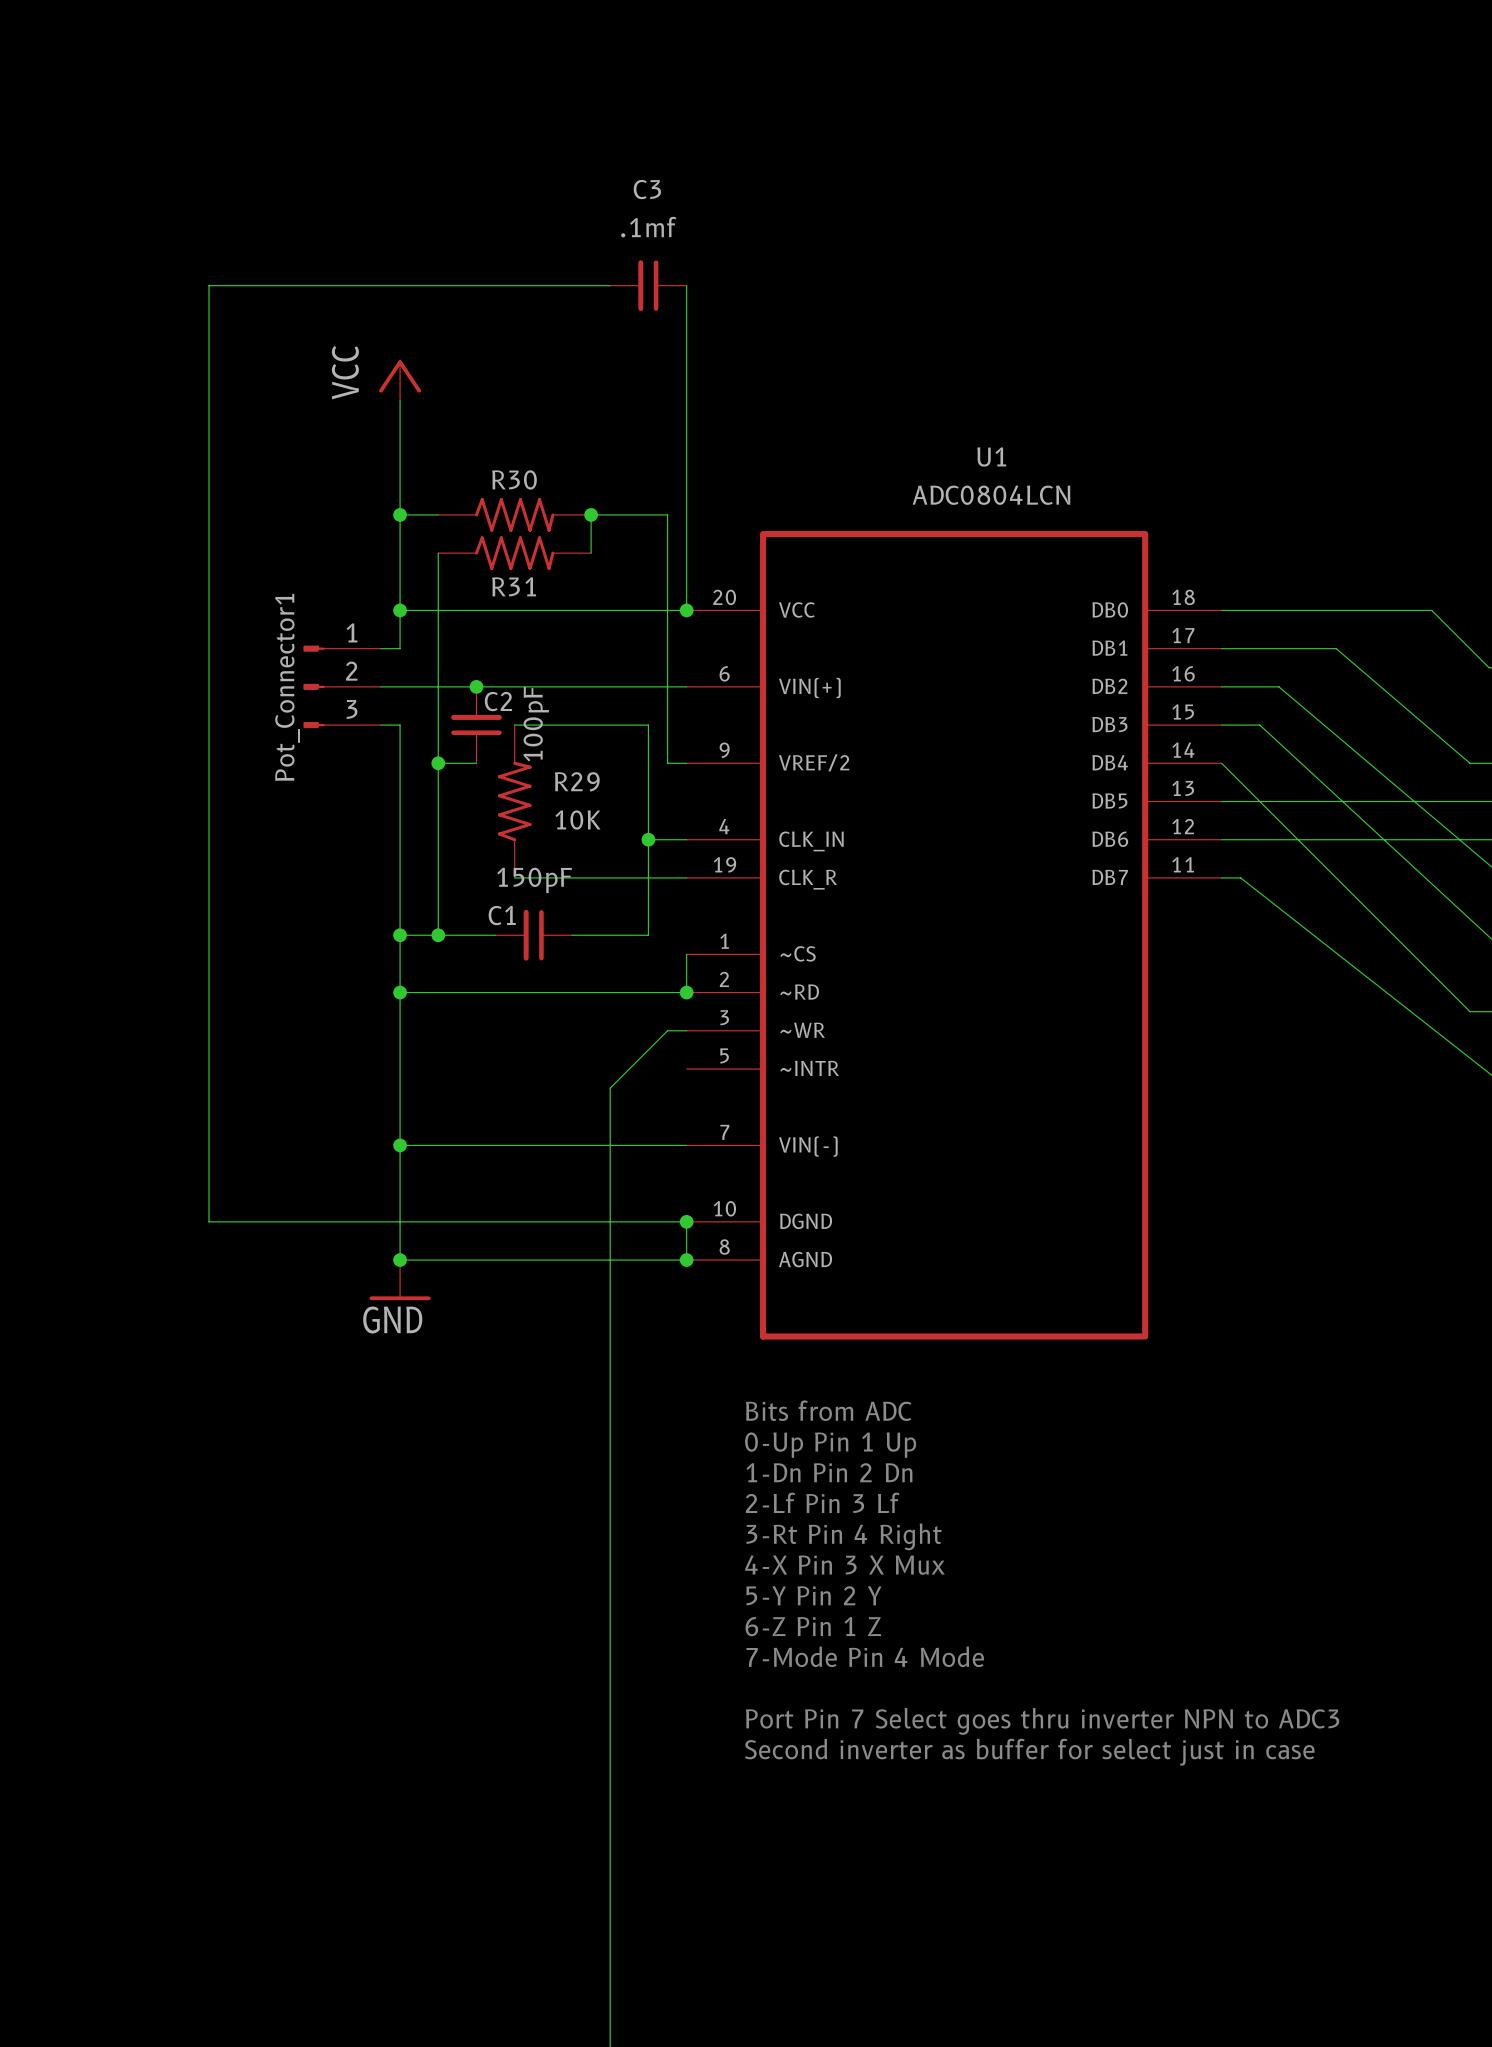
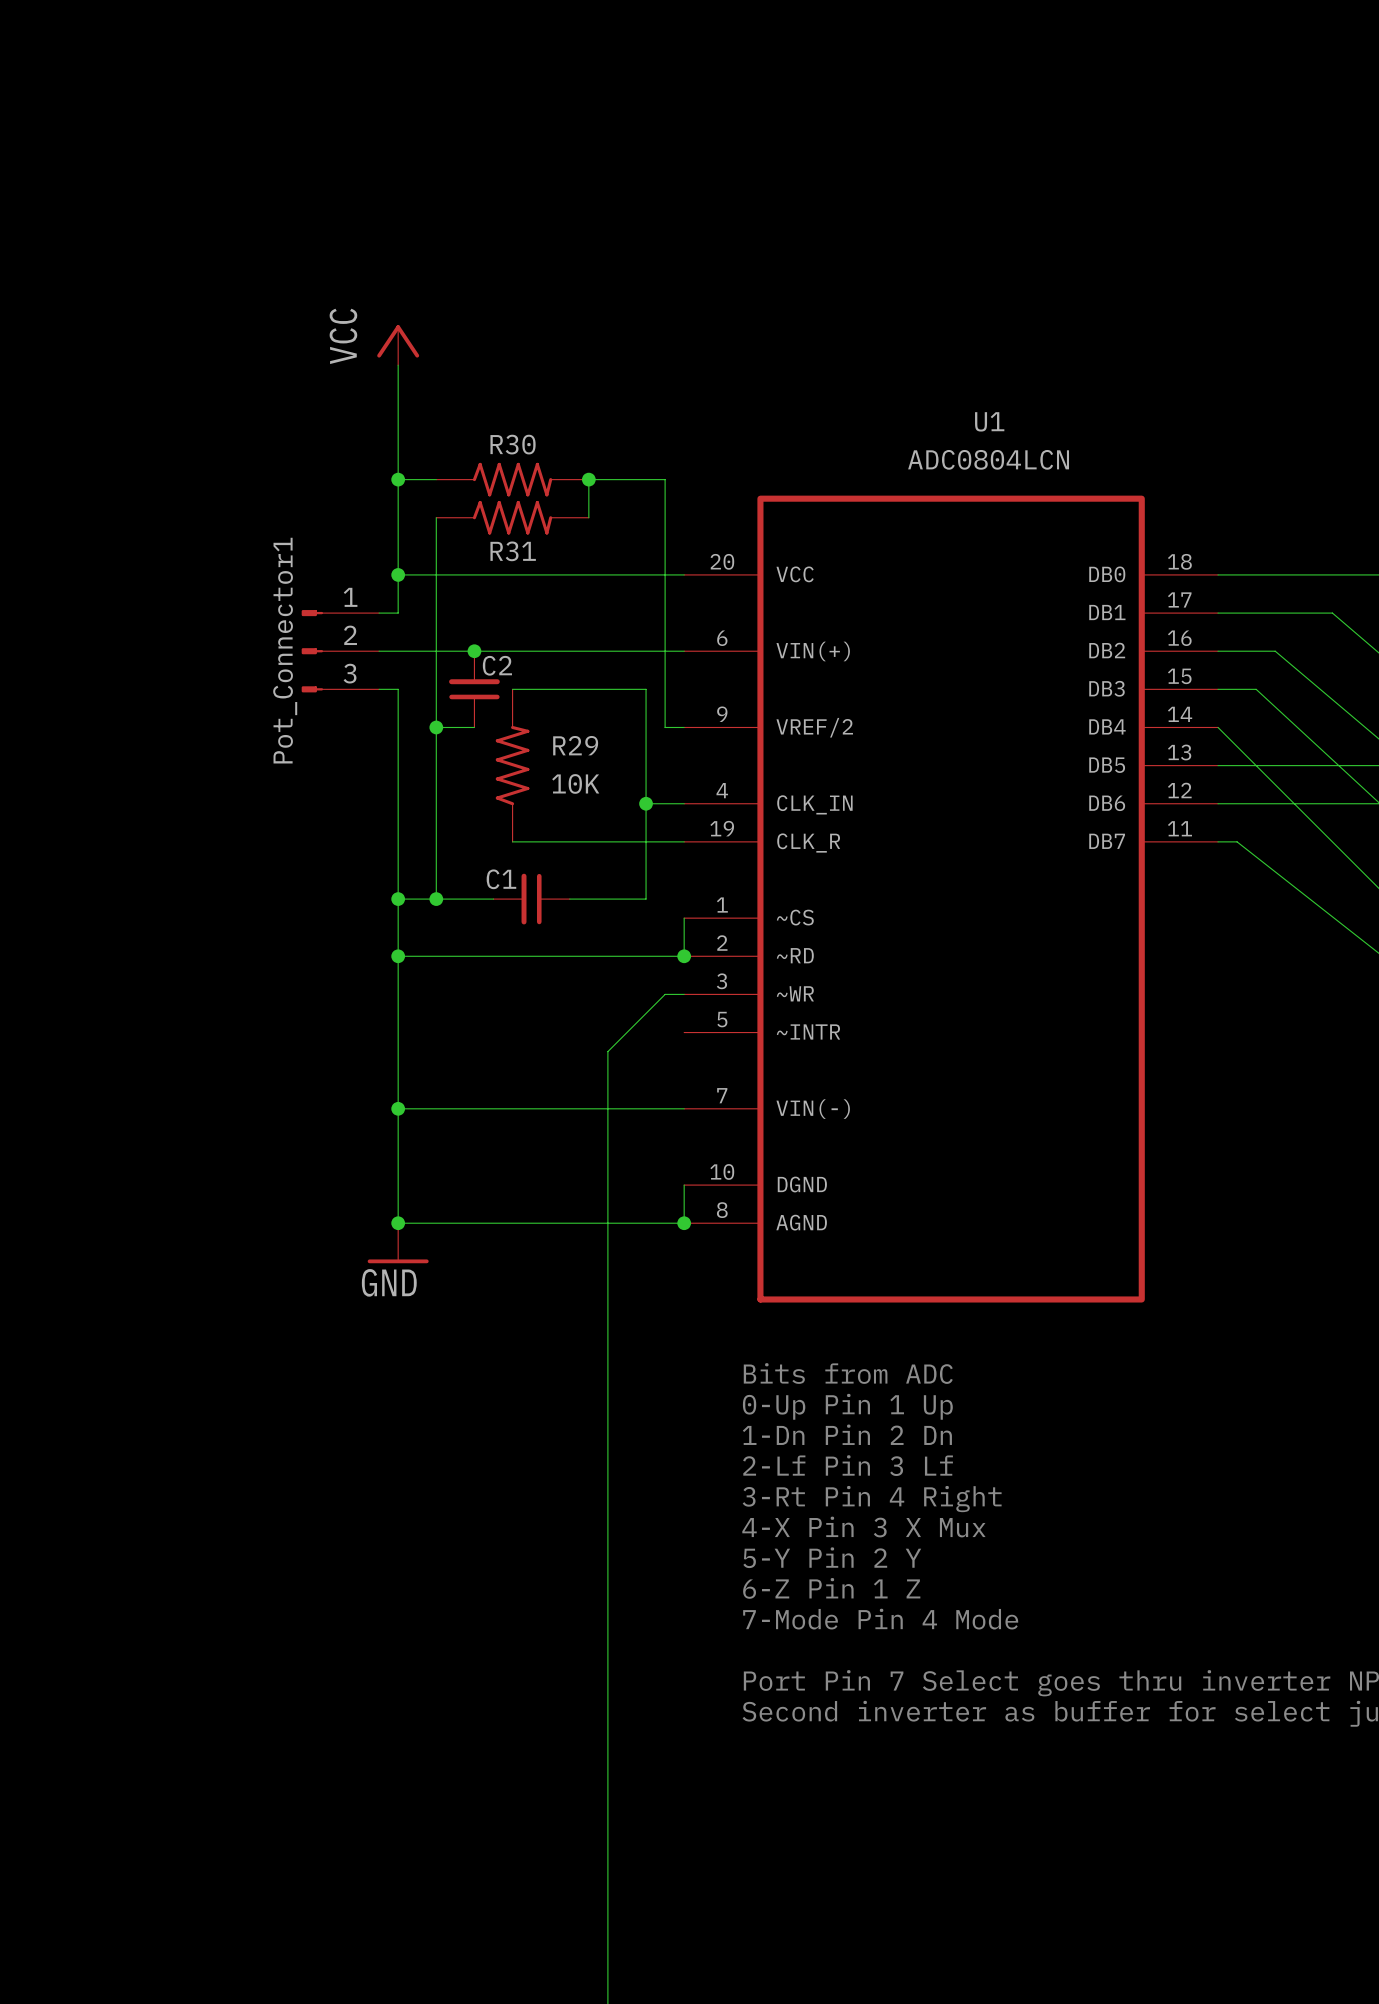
wire: (610, 285) (209, 285) (209, 1221) (686, 1221) -> none
C3: .1mf (648, 285) -> none
wire: (686, 285) (686, 610) -> none
junction: (686, 610) -> none
C2 value: 100pF (536, 724) -> none
C1 value: 150pF (534, 880) -> none
junction: (686, 1221) -> none

